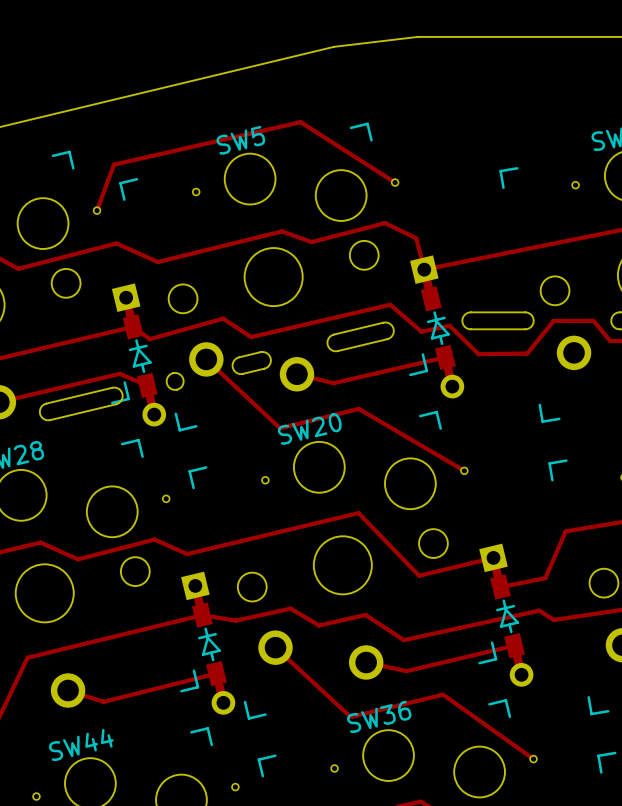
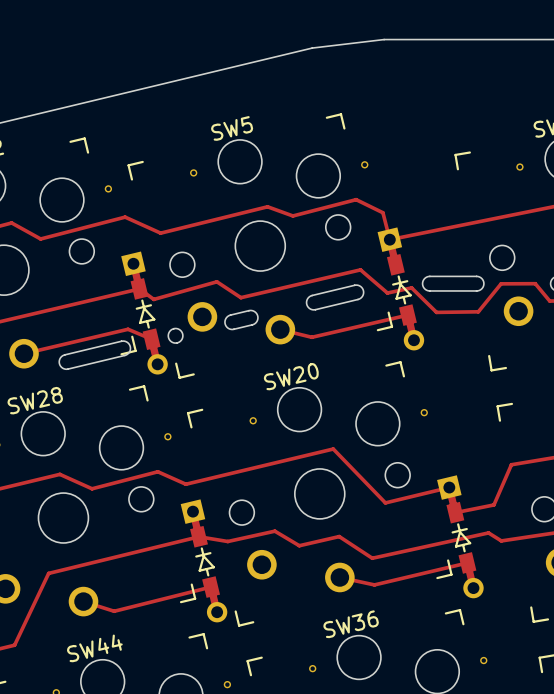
track: (395, 182) (300, 122) (113, 164) (97, 210) -> none
track: (206, 359) (280, 428) (358, 408) (464, 470) -> none
track: (275, 647) (350, 717) (443, 694) (533, 759) -> none

